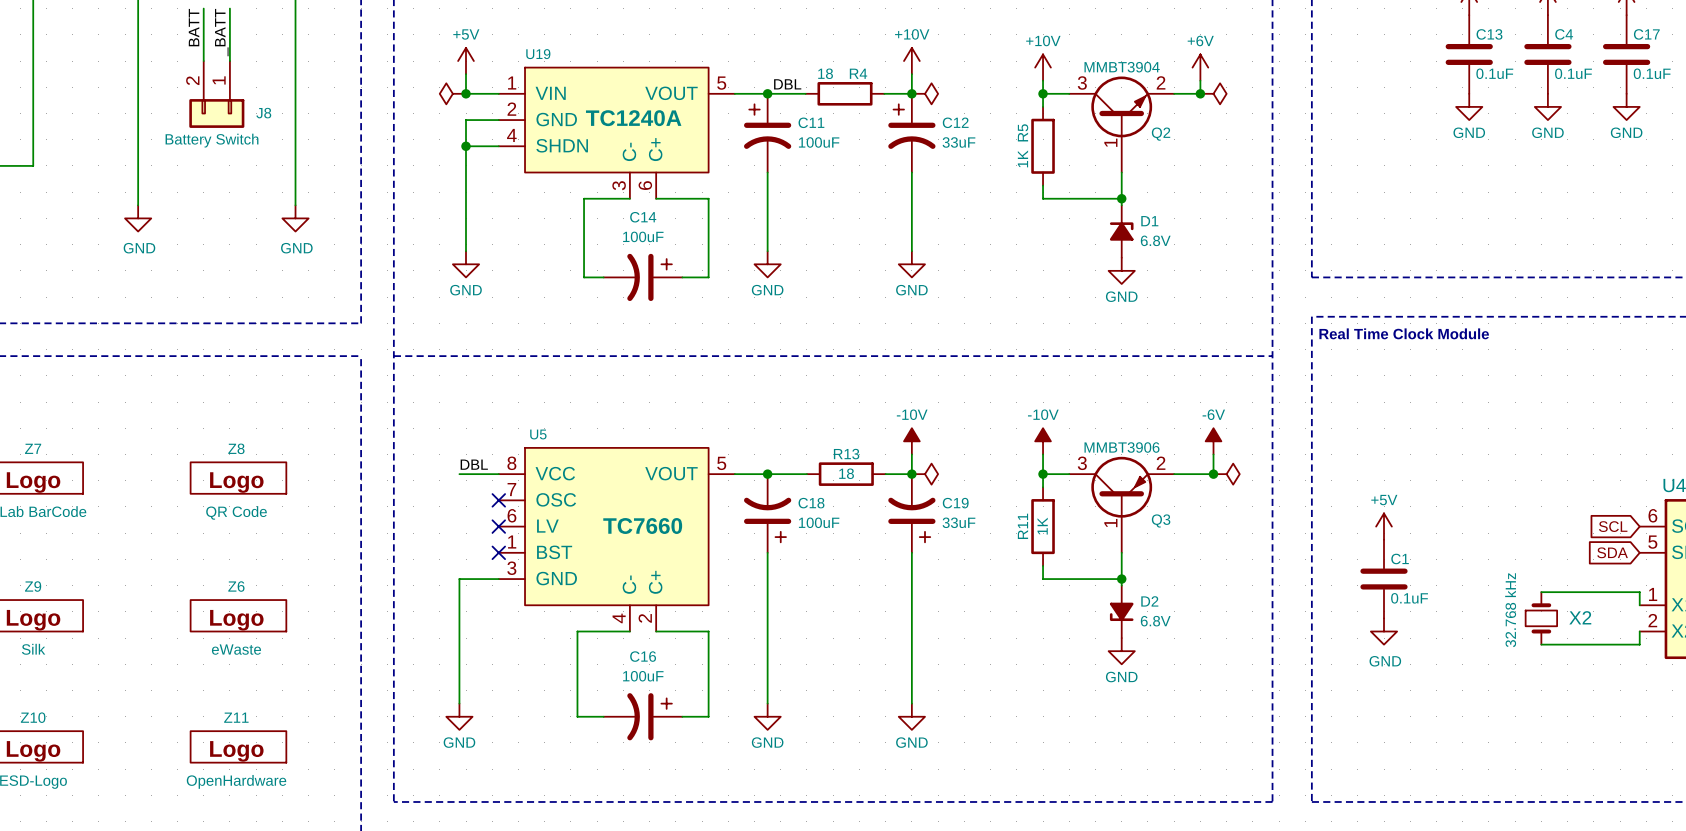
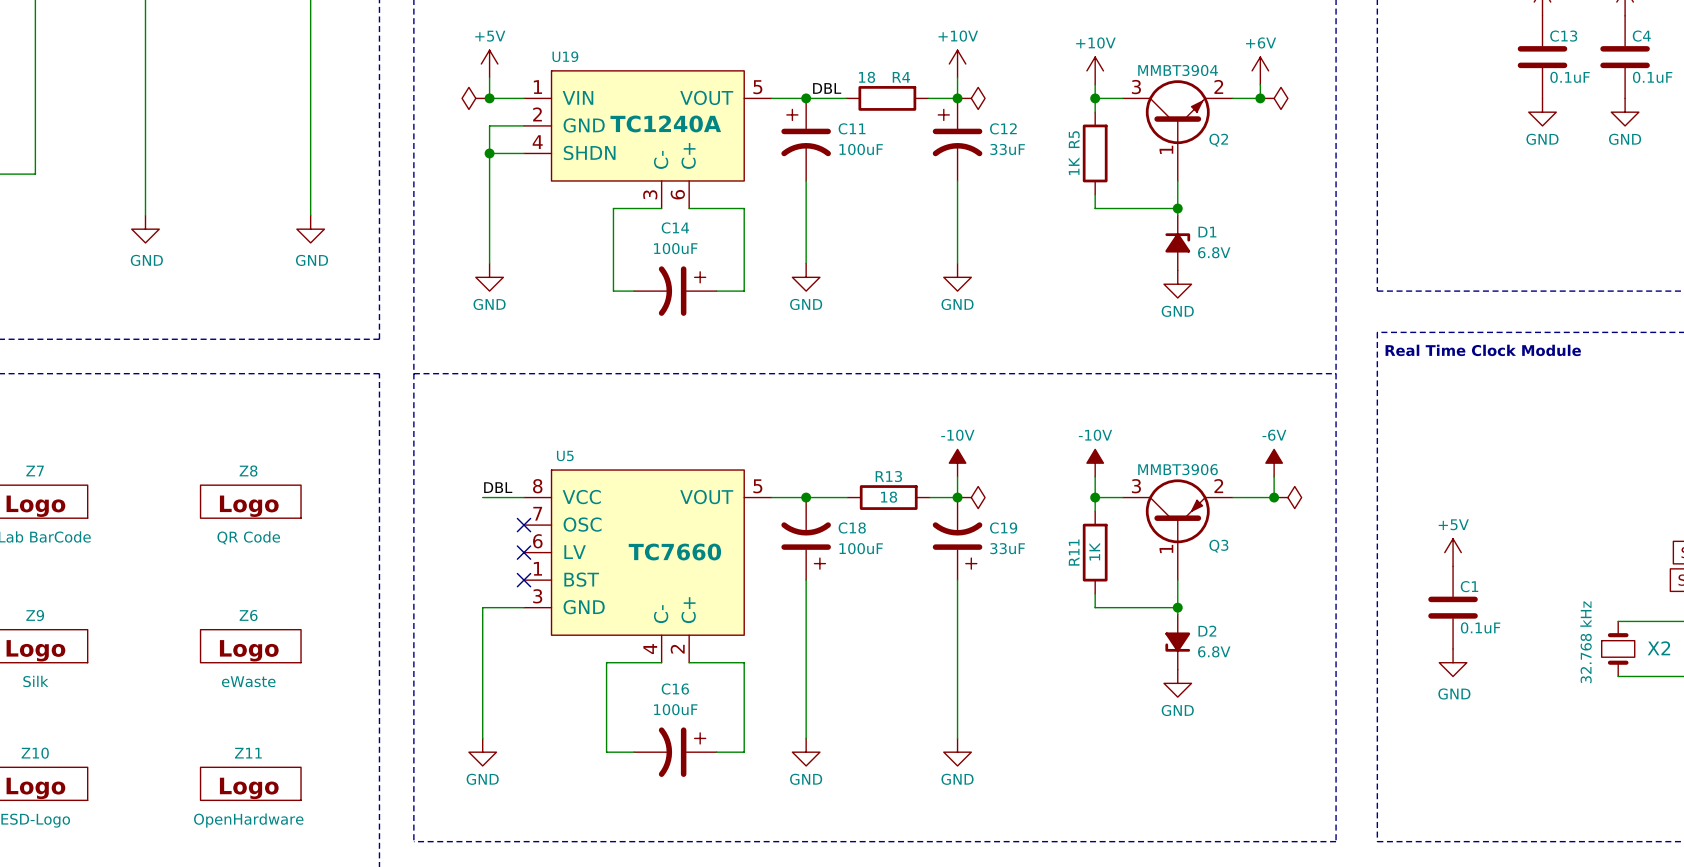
wire: (203, 8) (203, 61) -> none
wire: (229, 8) (229, 61) -> none
label: BATT (194, 27) -> none
label: _BATT (221, 32) -> none
J8: Battery Switch (216, 94) -> none

